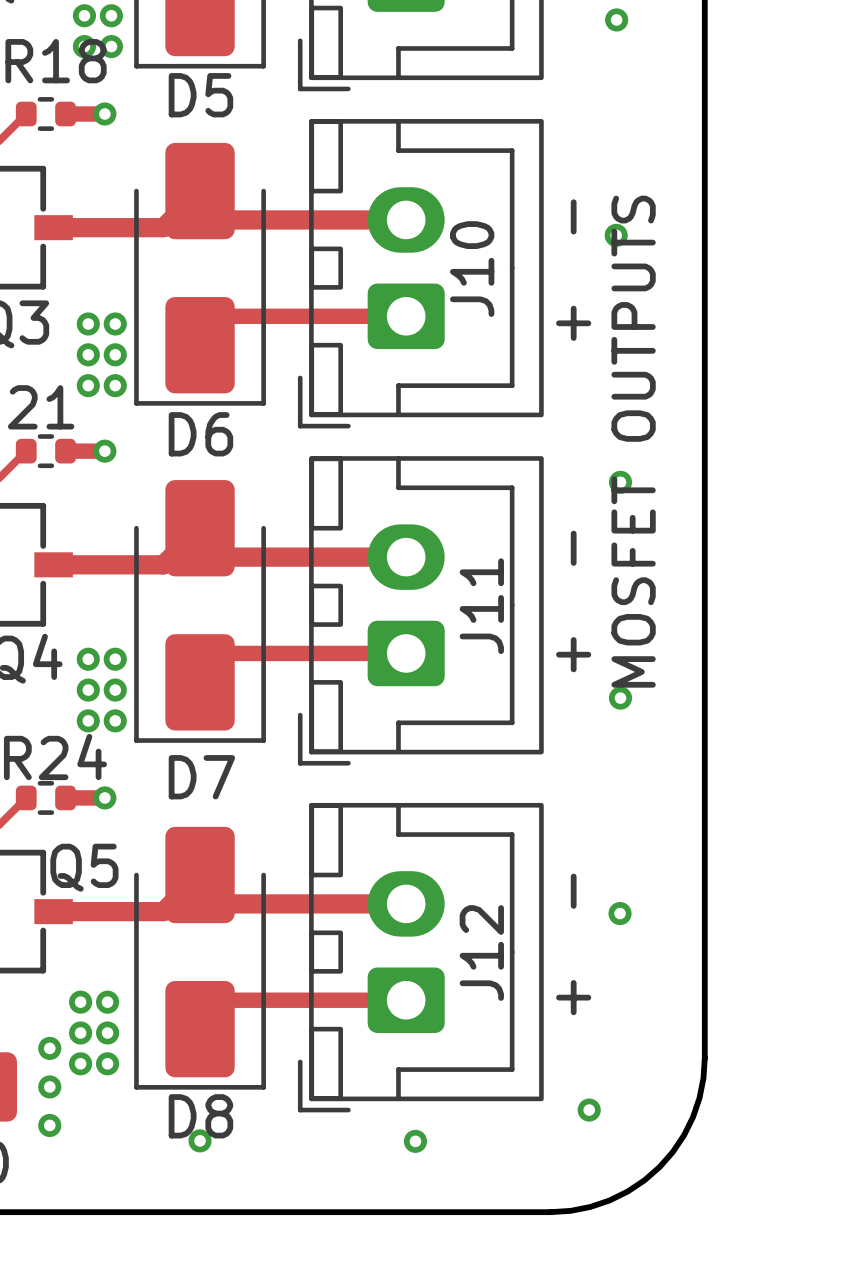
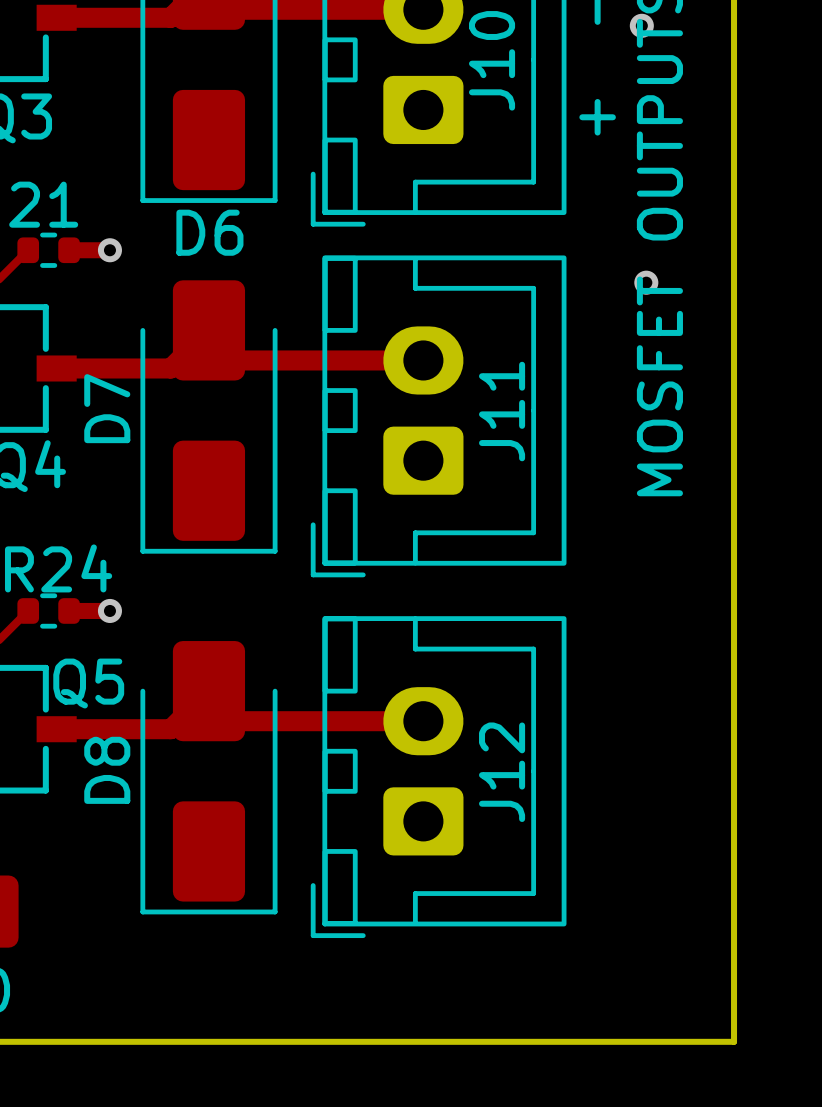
top track: (406, 316) (228, 316) (200, 345) -> none
via: (88, 324) -> none
via: (115, 324) -> none
via: (88, 354) -> none
via: (115, 354) -> none
via: (88, 385) -> none
via: (115, 385) -> none
text: + - (573, 601) -> none
top track: (406, 653) (228, 653) (200, 682) -> none
via: (88, 659) -> none
via: (115, 659) -> none
via: (88, 690) -> none
via: (115, 690) -> none
via: (620, 698) -> none
via: (88, 720) -> none
via: (115, 720) -> none
D7 name rotation: 0° (201, 777) -> 90° counterclockwise (107, 408)
D7 name position: D7 (201, 777) -> D7 (107, 408)
via: (620, 913) -> none
text: + - (573, 944) -> none
top track: (406, 1000) (228, 1000) (200, 1029) -> none
via: (80, 1002) -> none
via: (107, 1002) -> none
via: (80, 1032) -> none
via: (107, 1032) -> none
via: (49, 1048) -> none
board edge: (704, 1058) (699, 1097) (693, 1117) (672, 1151) (659, 1167) (644, 1180) (609, 1200) (570, 1210) (550, 1212) -> (734, 881) (734, 1041) (573, 1041)
via: (80, 1063) -> none
via: (107, 1063) -> none
via: (49, 1086) -> none
via: (589, 1110) -> none
D8 name rotation: 0° (200, 1116) -> 90° counterclockwise (107, 770)
D8 name position: D8 (200, 1116) -> D8 (107, 770)
via: (49, 1125) -> none
via: (200, 1140) -> none
via: (415, 1141) -> none

